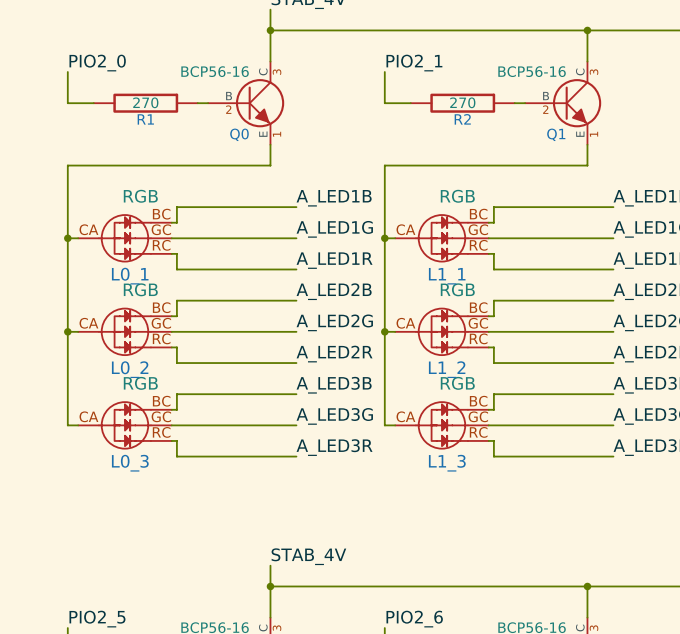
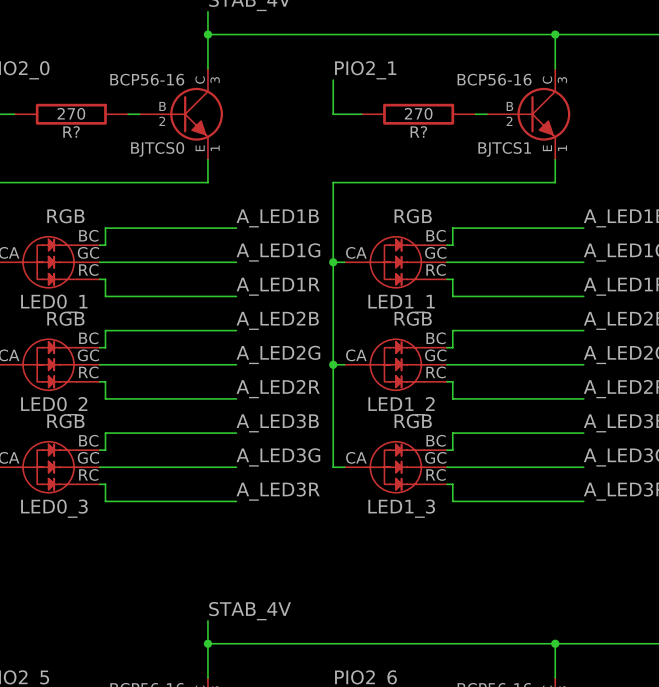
R1 name: R1 (145, 119) -> R? (71, 131)
R2 name: R2 (462, 119) -> R? (418, 131)
Q0 name: Q0 (239, 134) -> BJTCS0 (157, 149)
Q1 name: Q1 (556, 134) -> BJTCS1 (504, 149)
L0_1 name: L0_1 (130, 276) -> LED0_1 (54, 303)
L1_1 name: L1_1 (447, 276) -> LED1_1 (401, 303)
L0_2 name: L0_2 (130, 369) -> LED0_2 (54, 406)
L1_2 name: L1_2 (447, 369) -> LED1_2 (401, 406)
L0_3 name: L0_3 (130, 463) -> LED0_3 (54, 508)
L1_3 name: L1_3 (447, 463) -> LED1_3 (401, 508)

